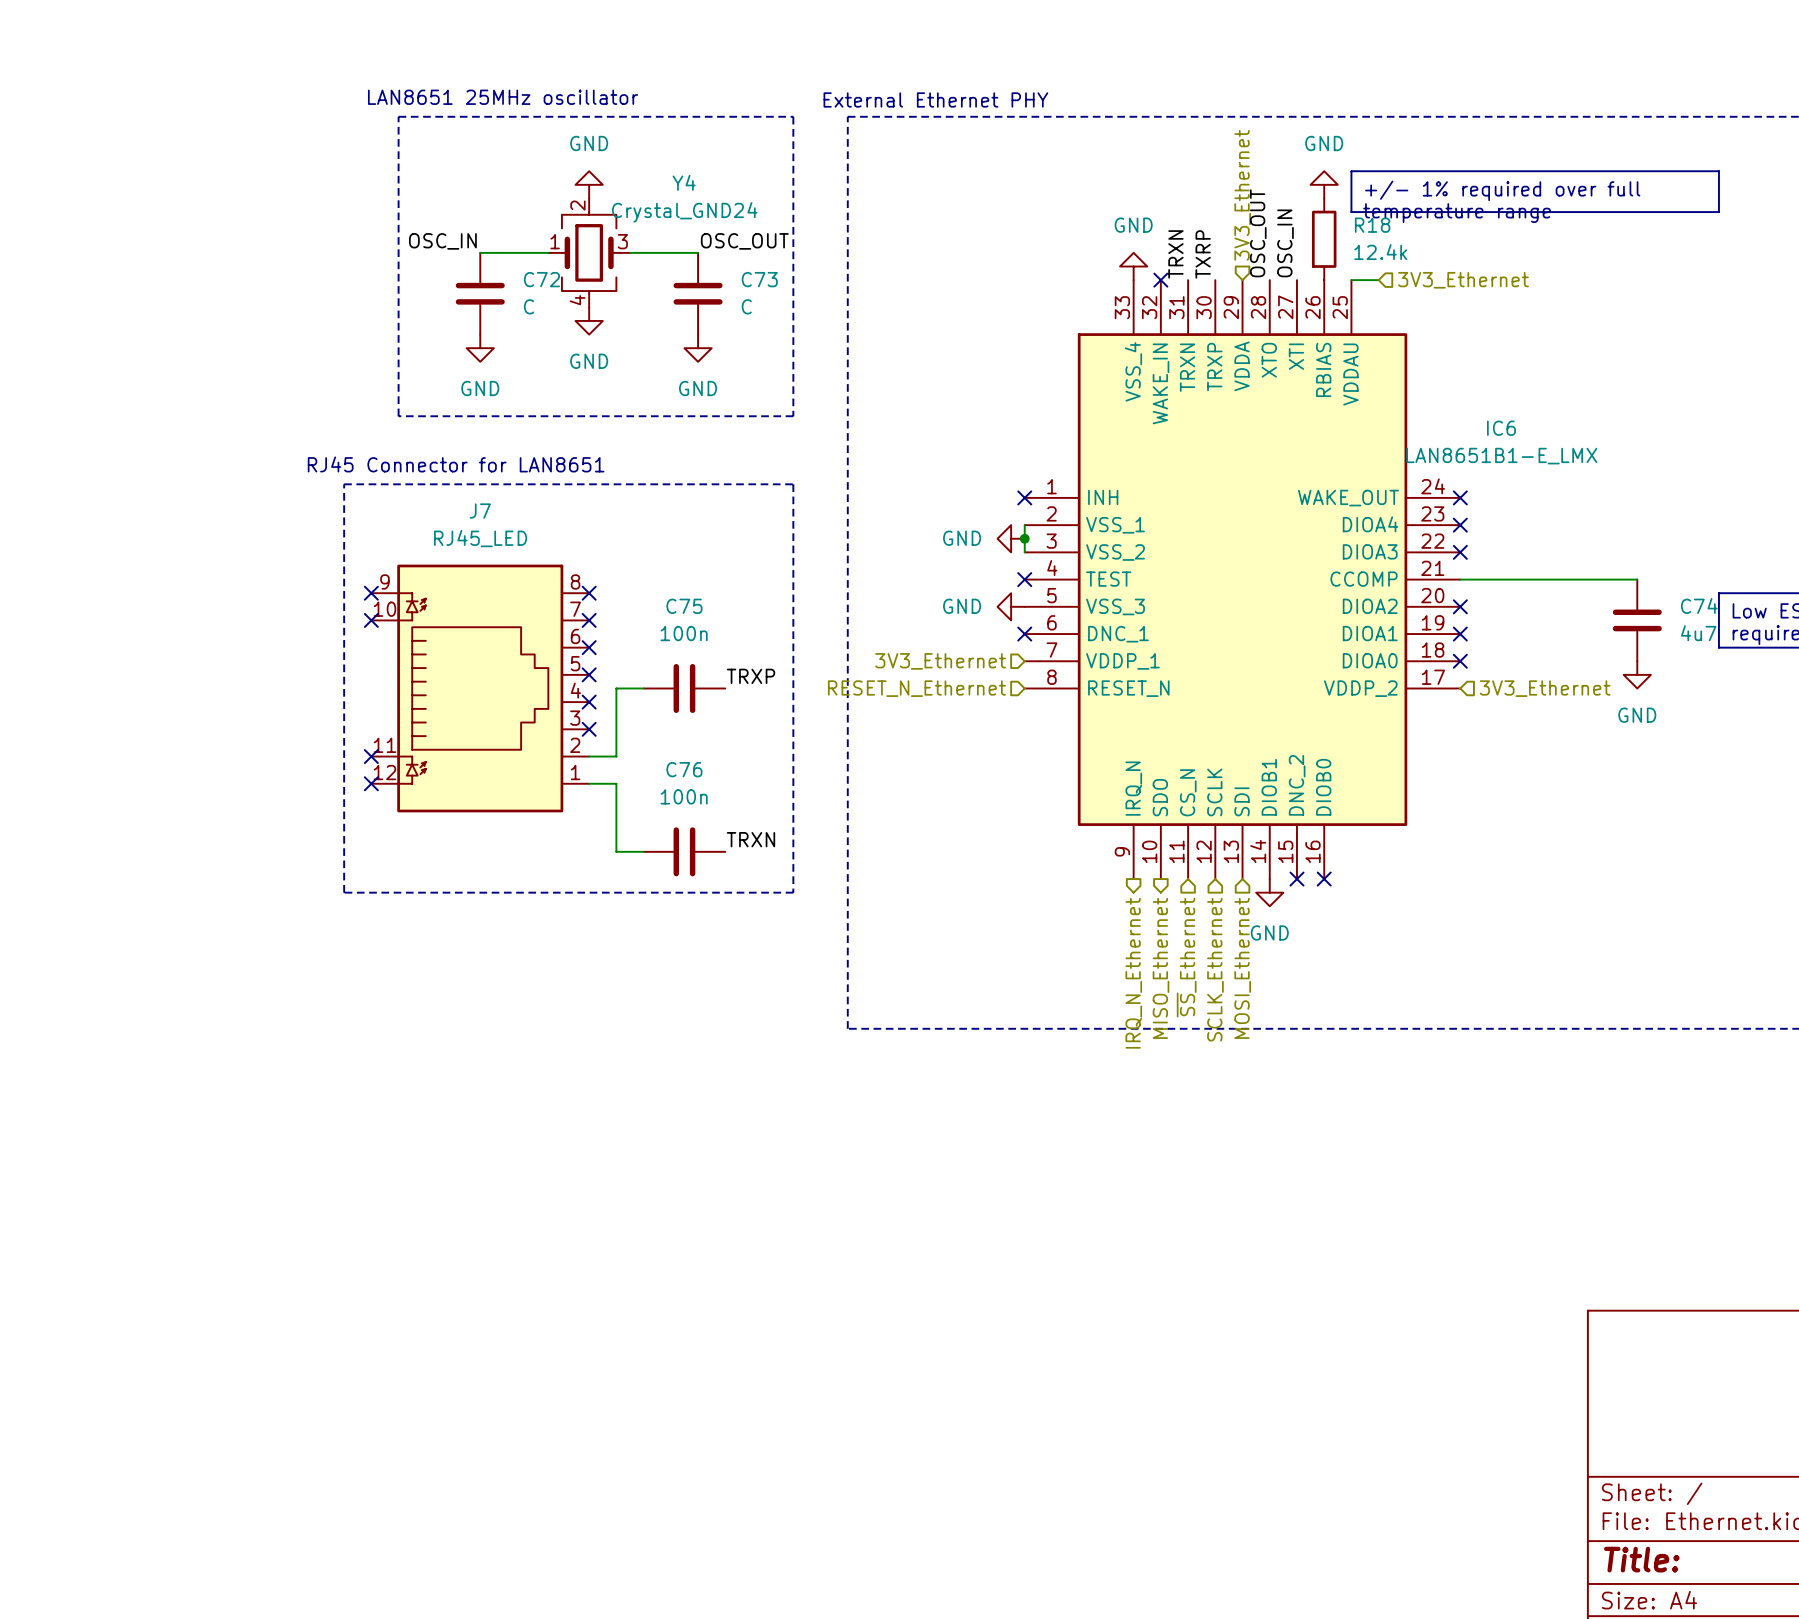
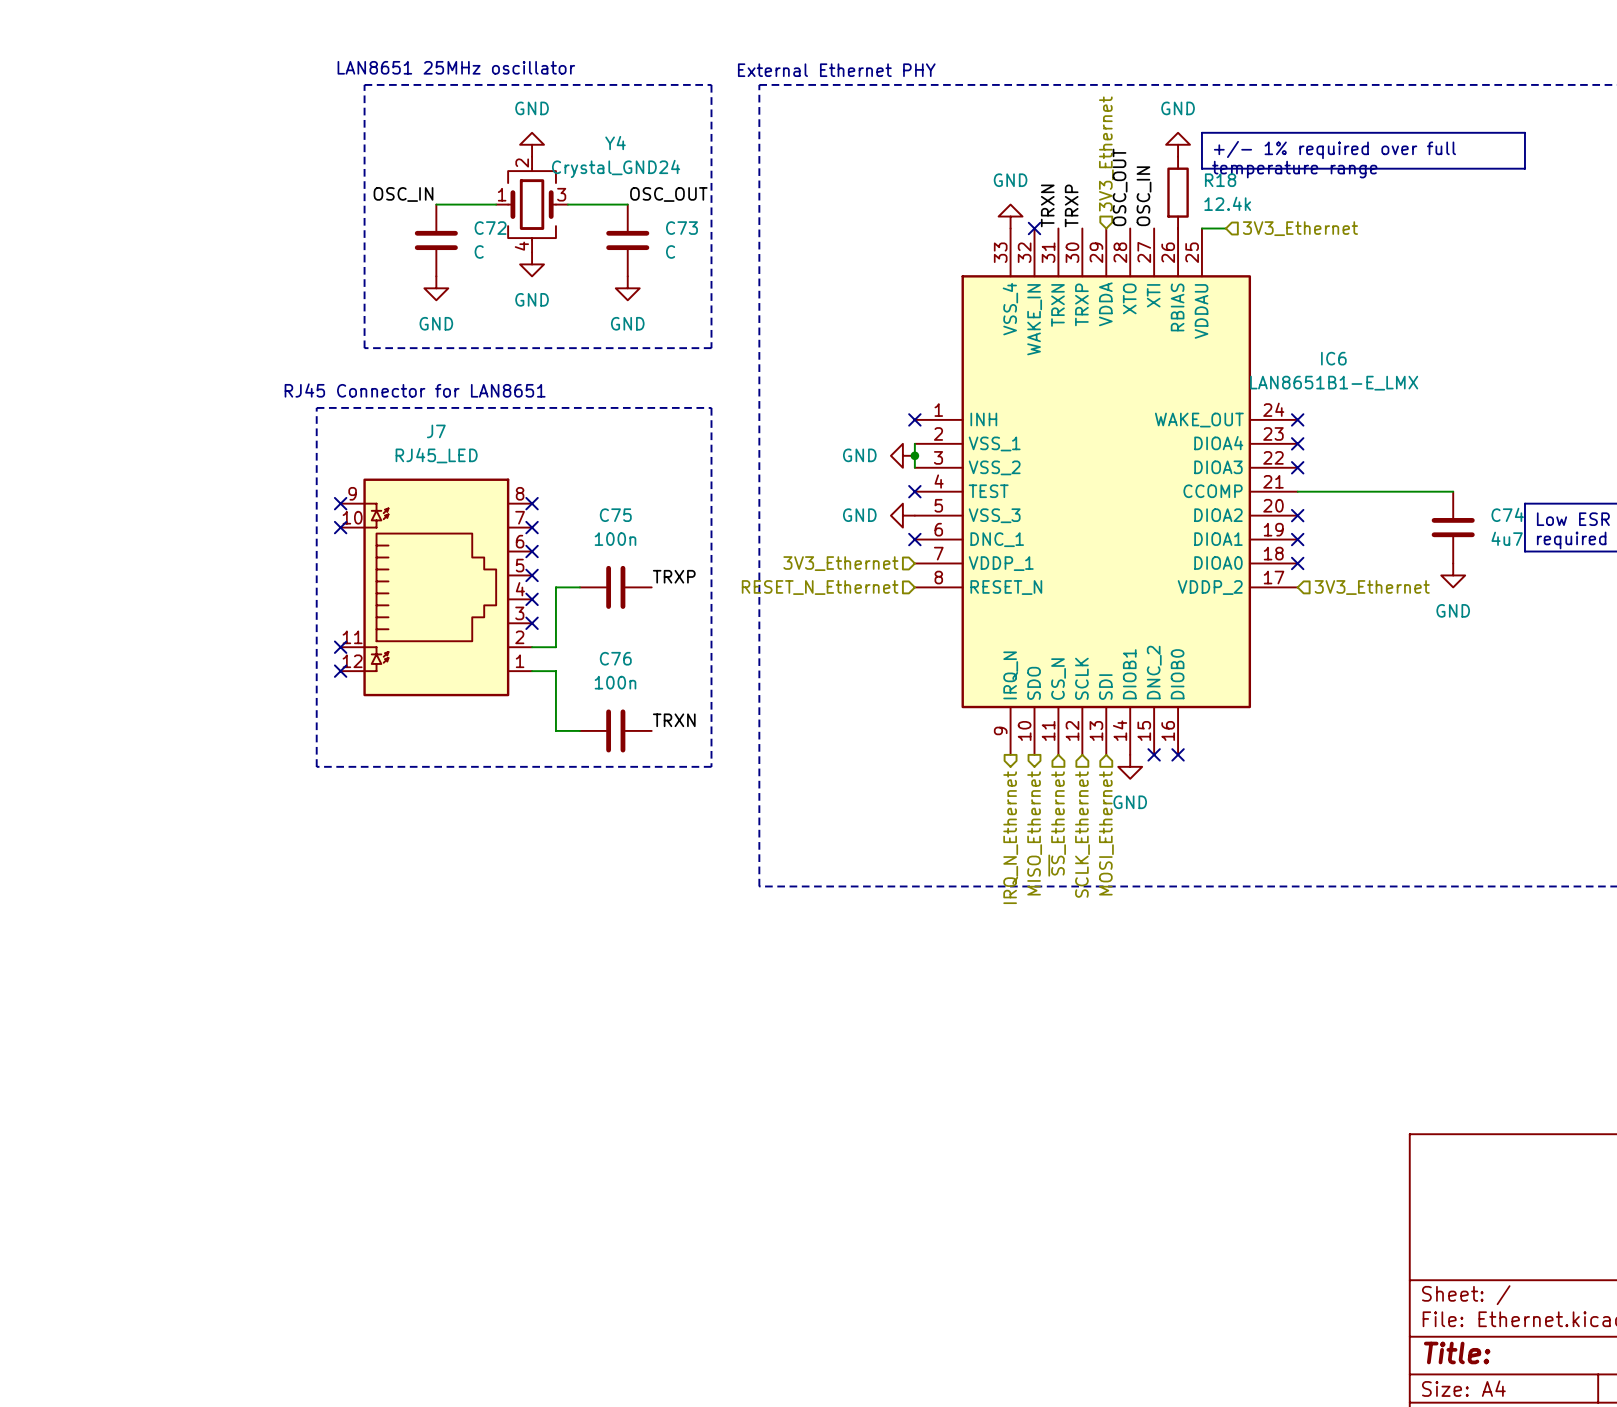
label: TXRP (1203, 254) -> TRXP (1071, 205)

